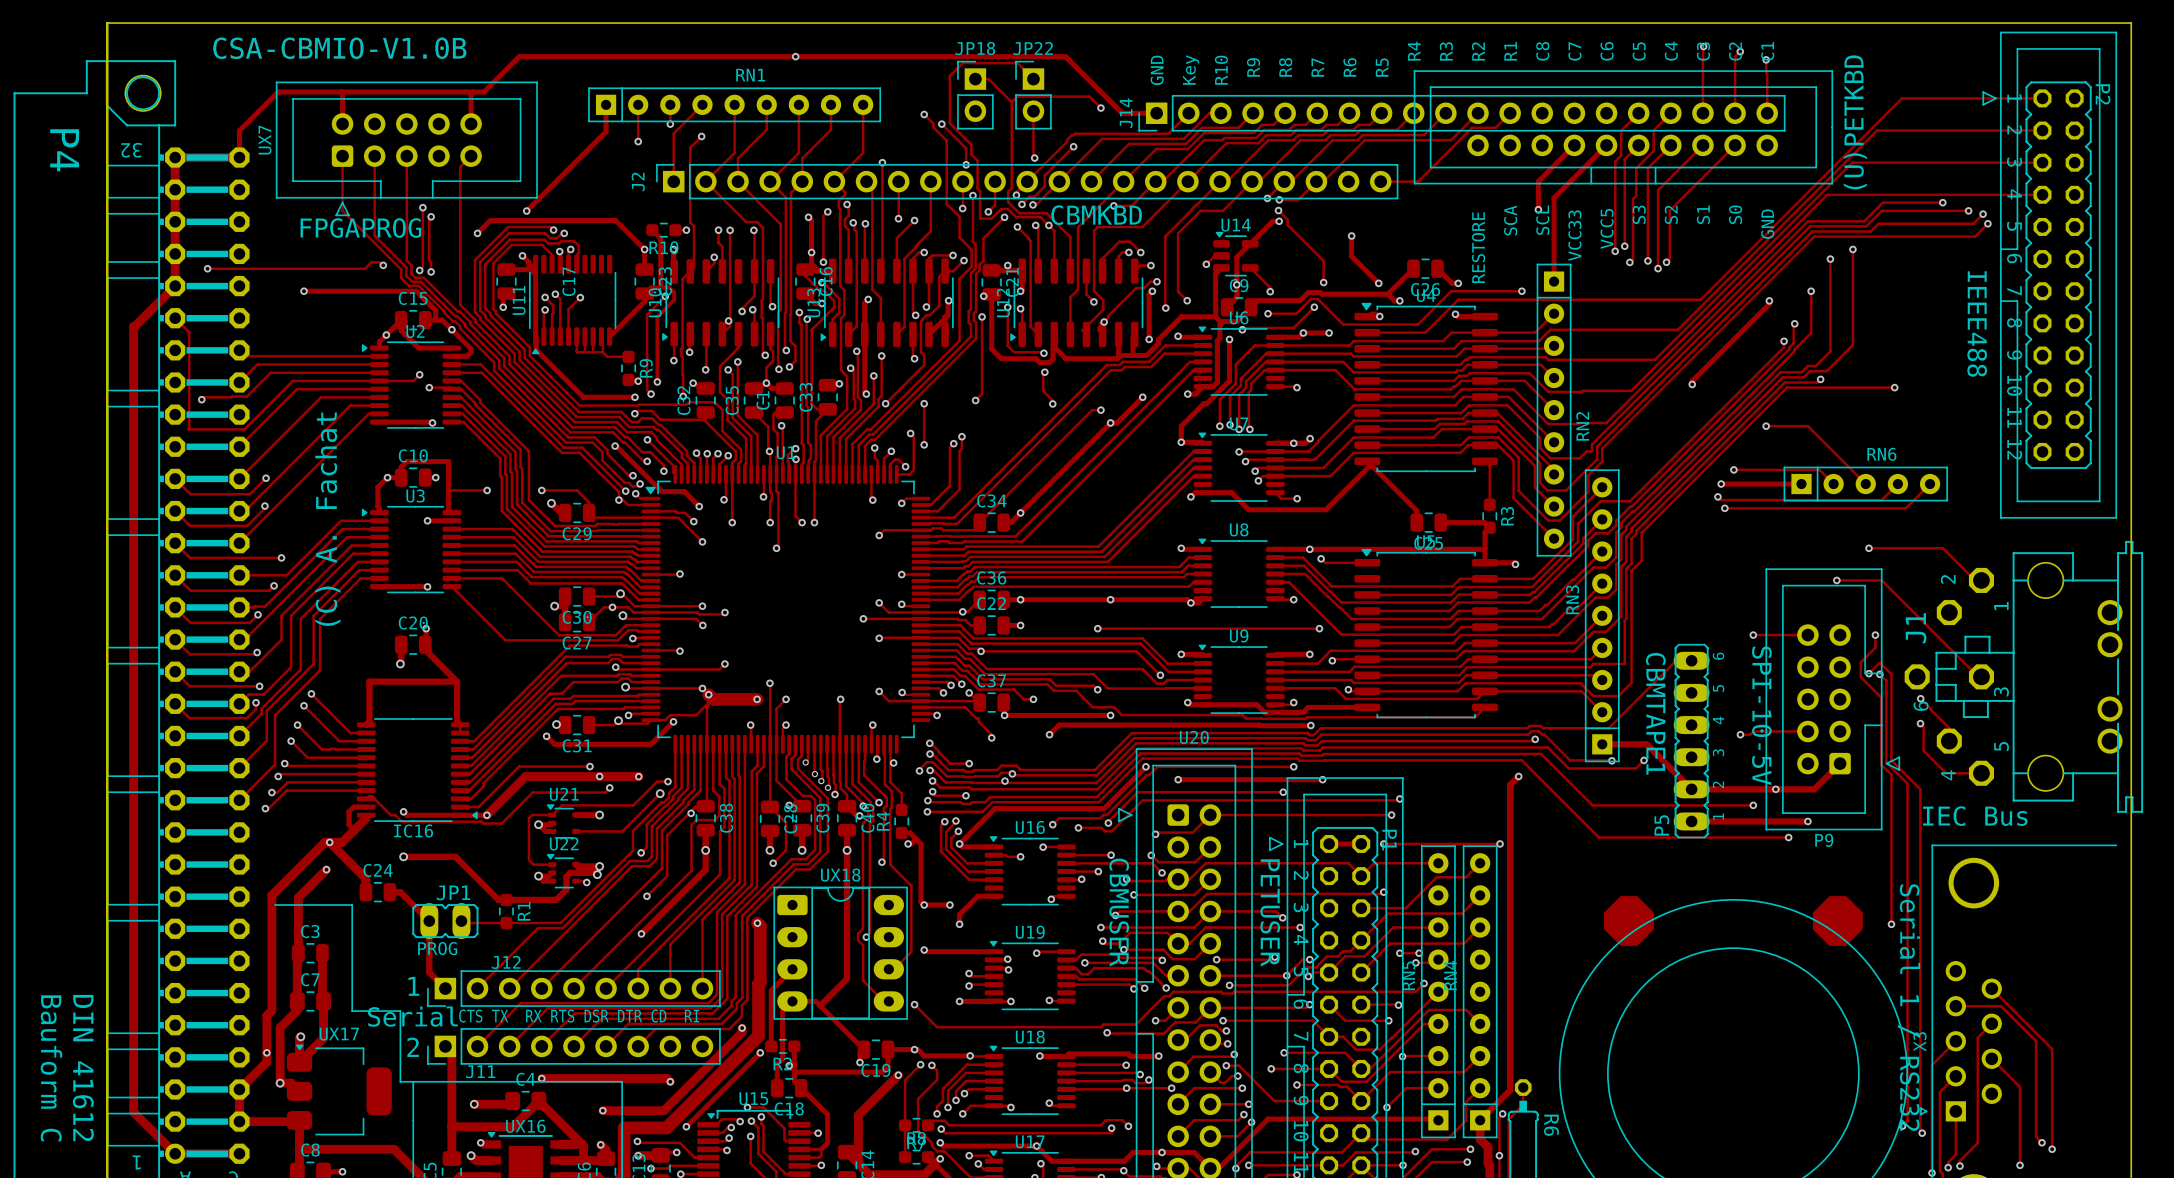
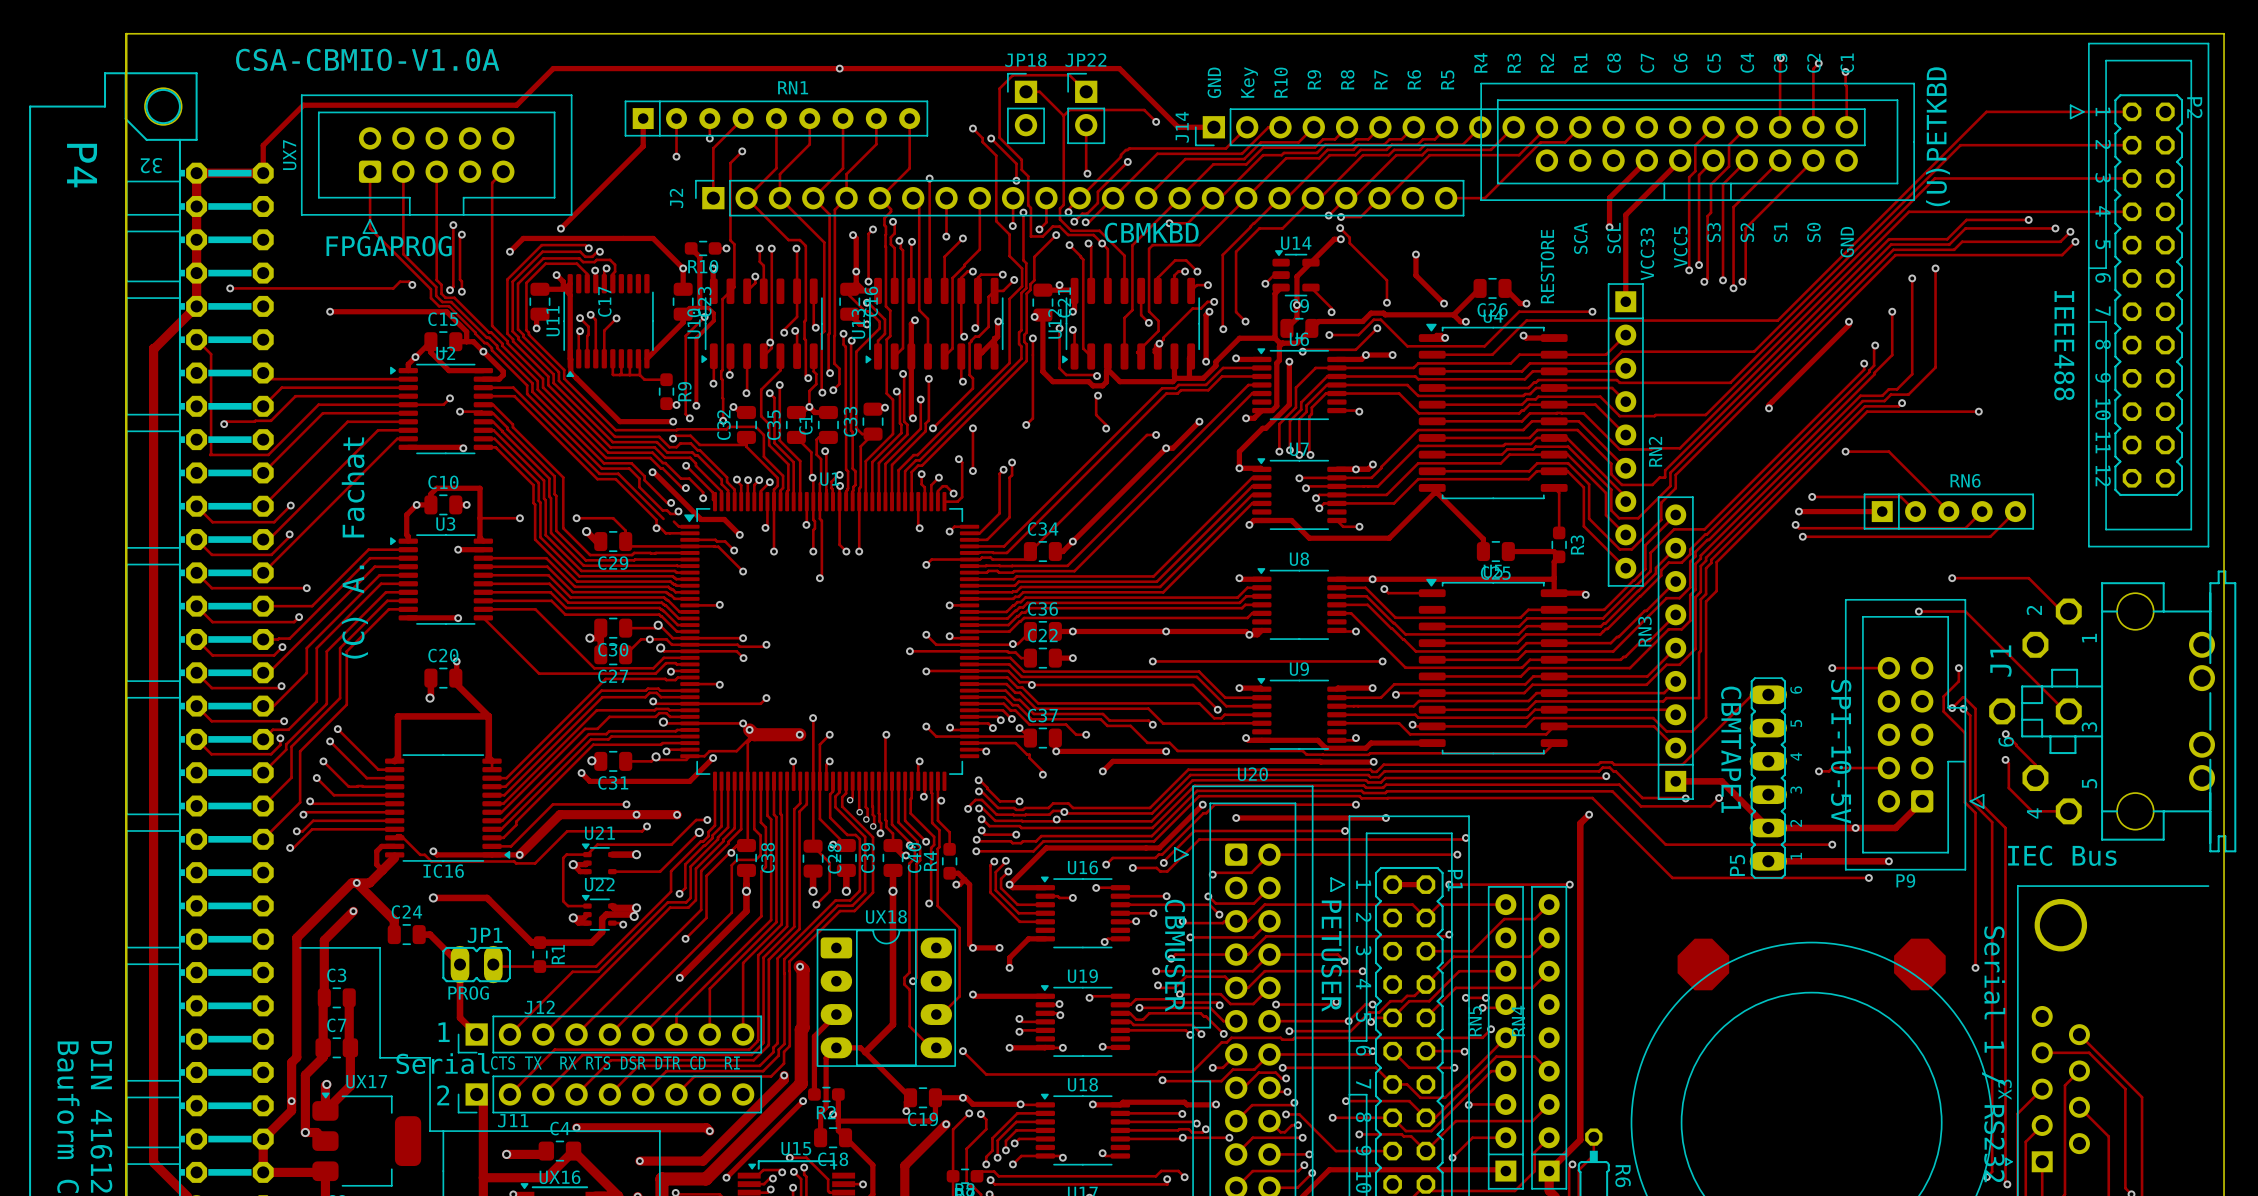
text: CSA-CBMIO-V1.0B (339, 48) -> none
text: none -> CSA-CBMIO-V1.0A (367, 59)
track: (341, 91) (342, 124) -> none
track: (473, 91) (471, 94) (471, 124) -> none
via: (625, 491) -> none
via: (635, 493) -> none

